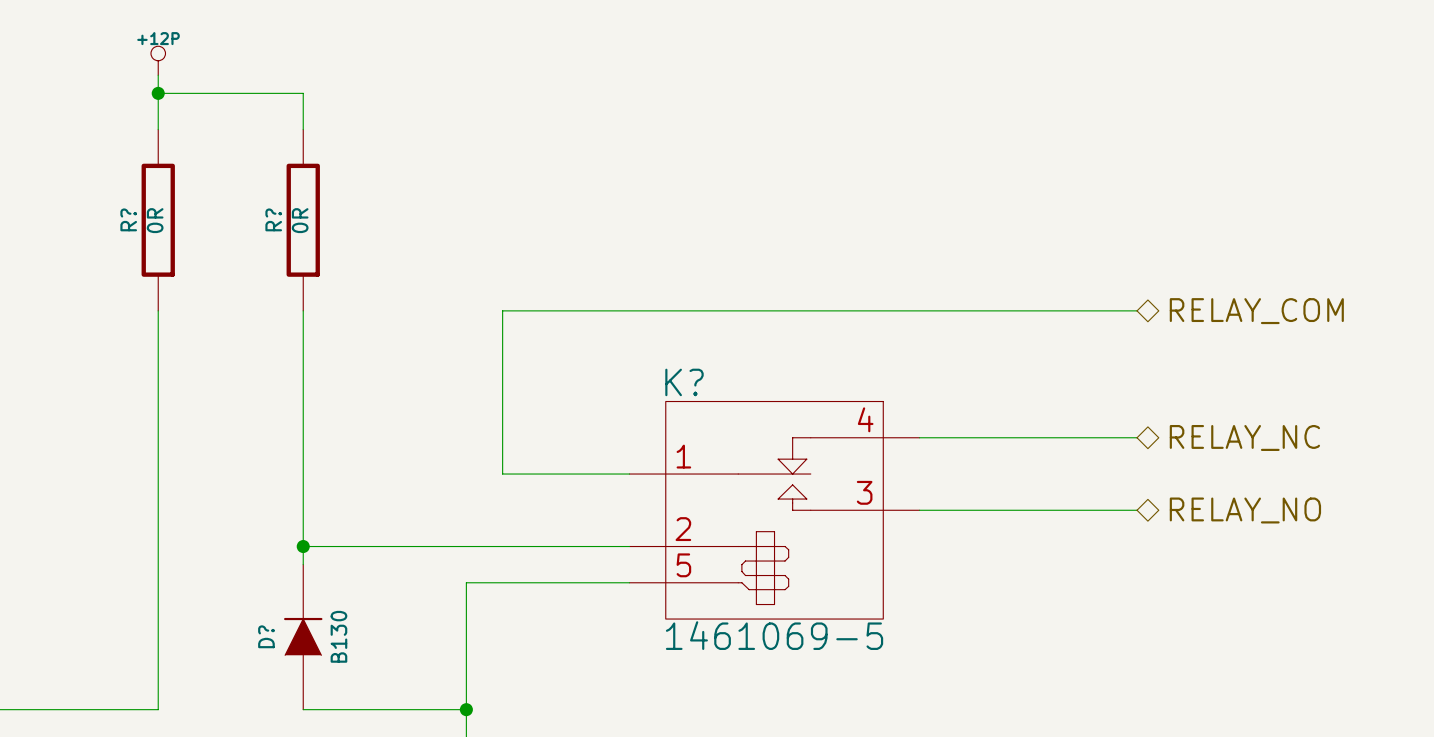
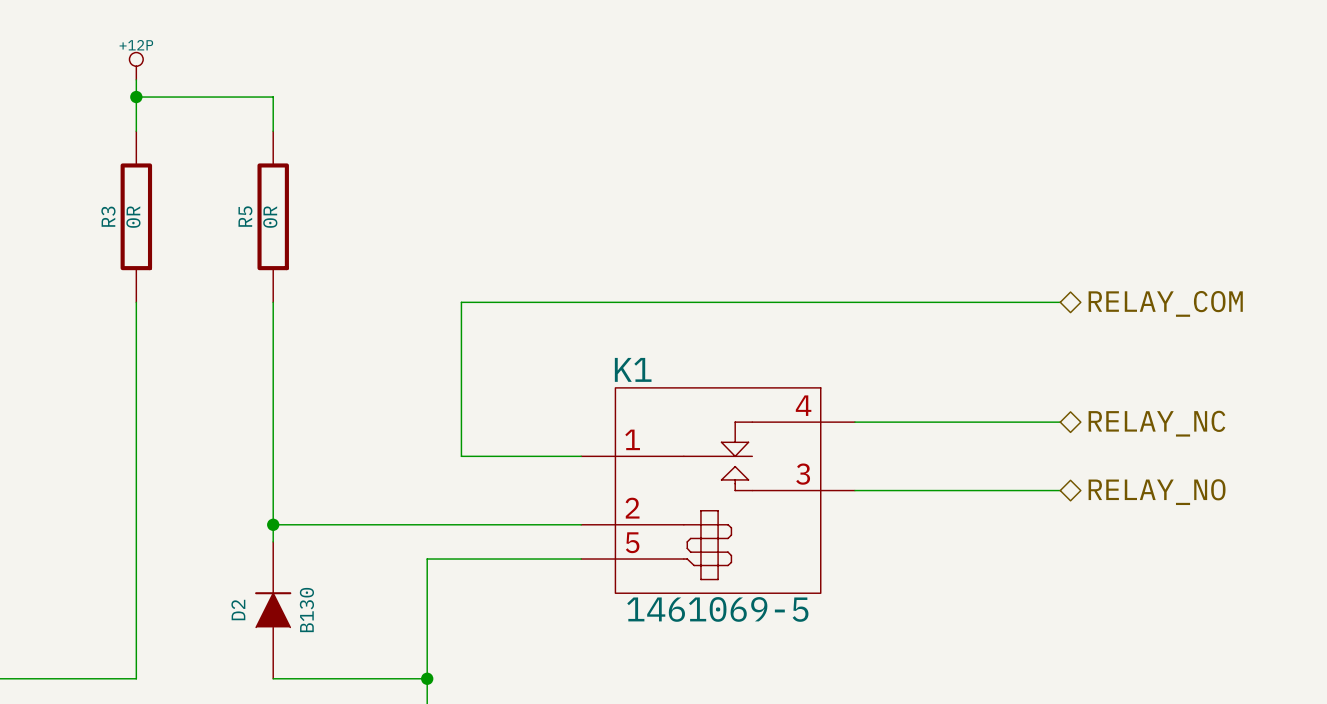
R? name: R? (128, 219) -> R3 (108, 216)
R? name: R? (273, 219) -> R5 (245, 216)
K? name: K? (684, 382) -> K1 (633, 369)
D? name: D? (266, 636) -> D2 (238, 610)

